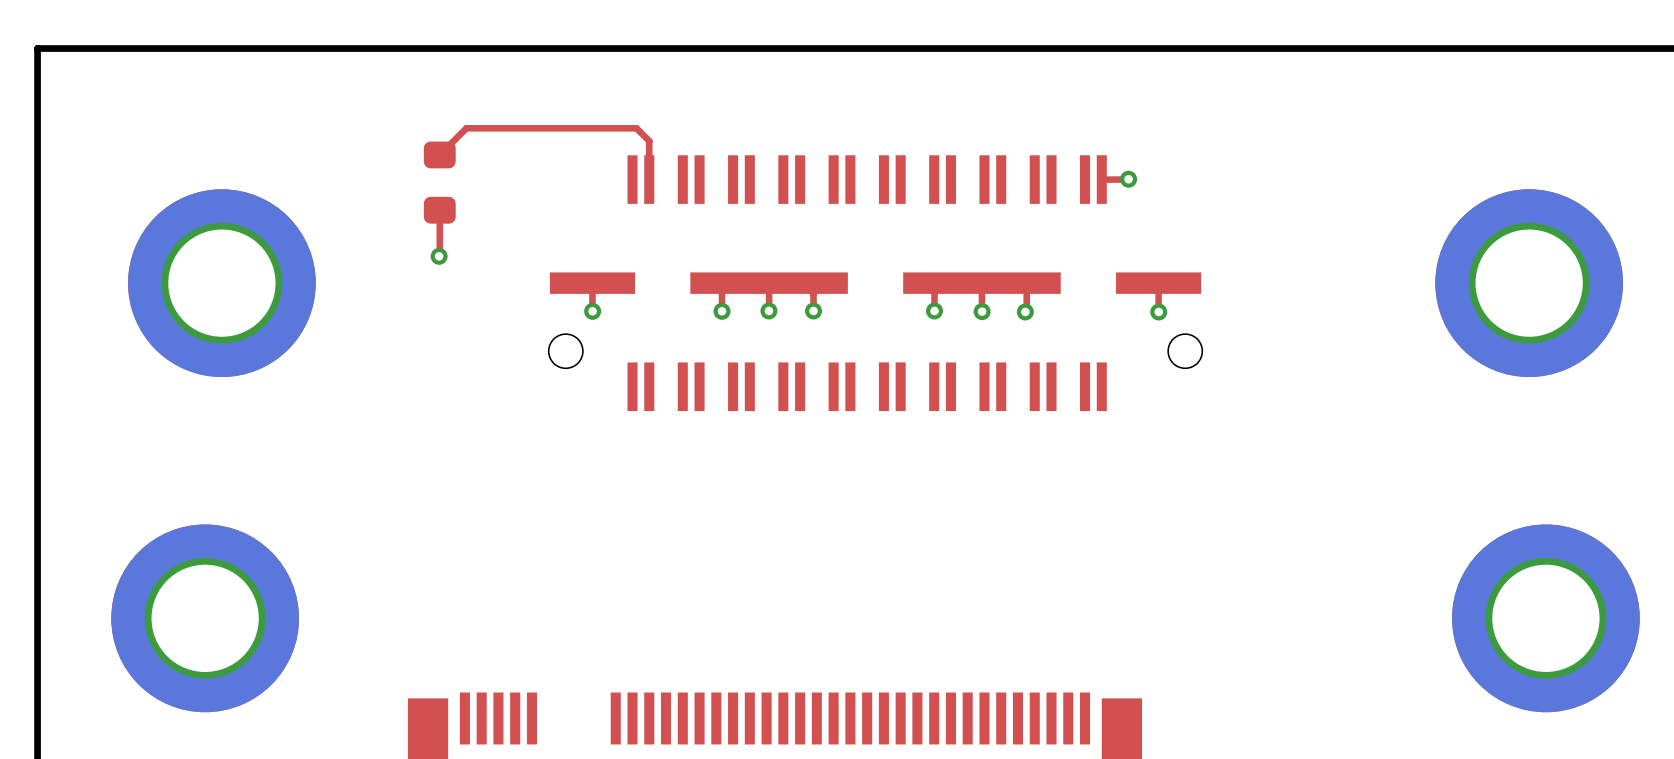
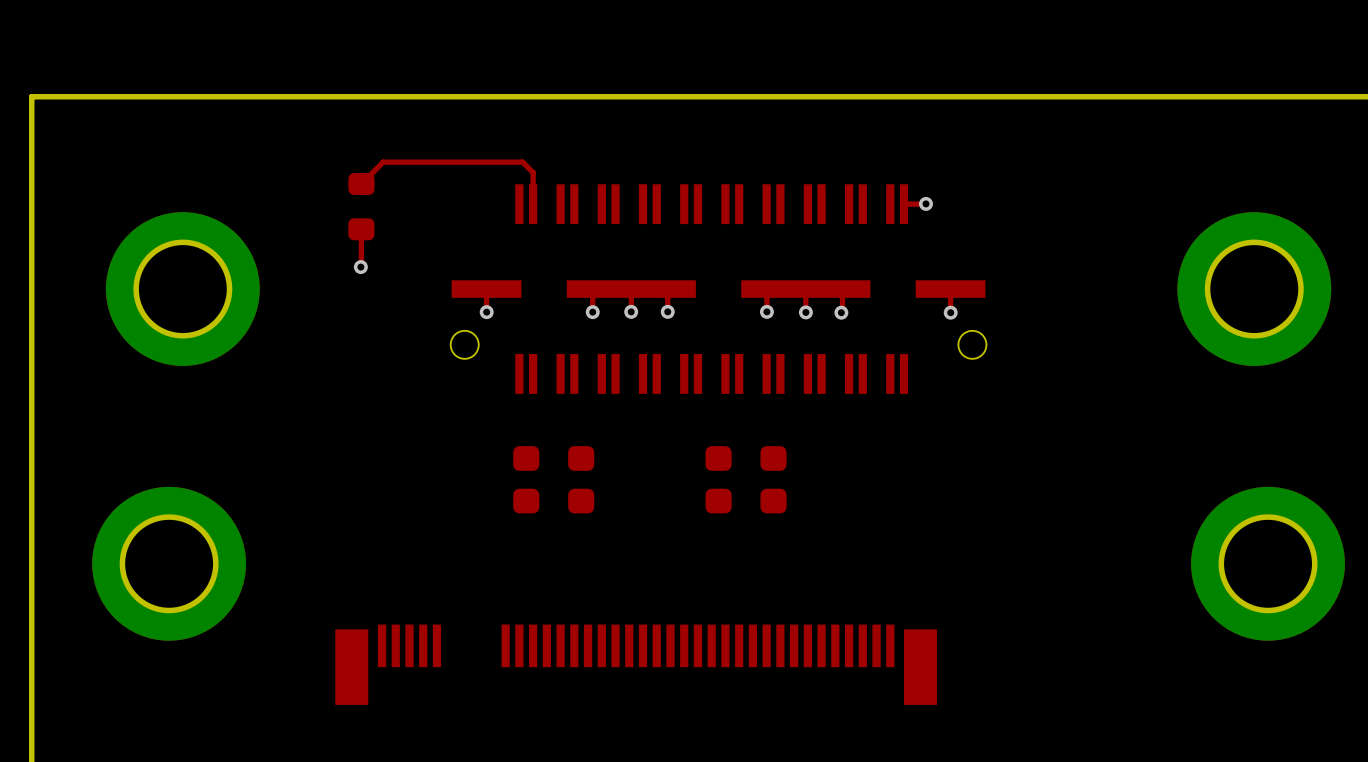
part: none -> (526, 479)
part: none -> (581, 479)
part: none -> (718, 479)
part: none -> (773, 479)

